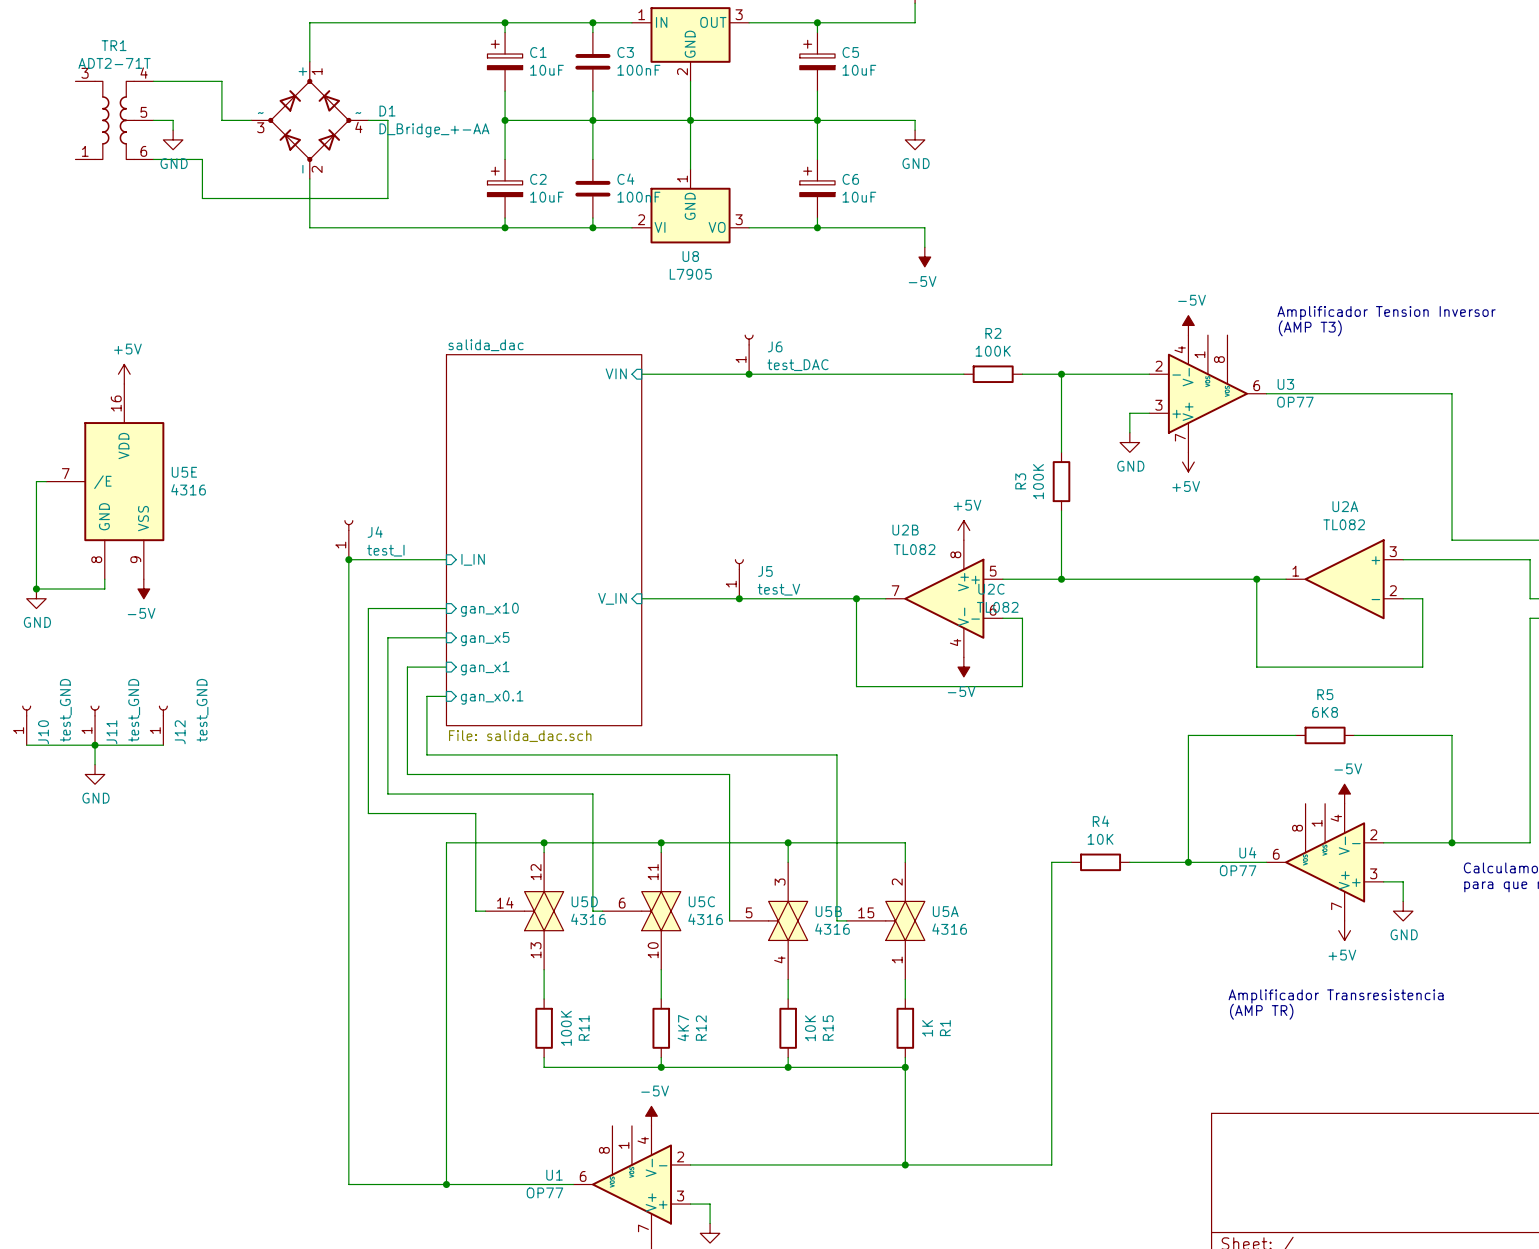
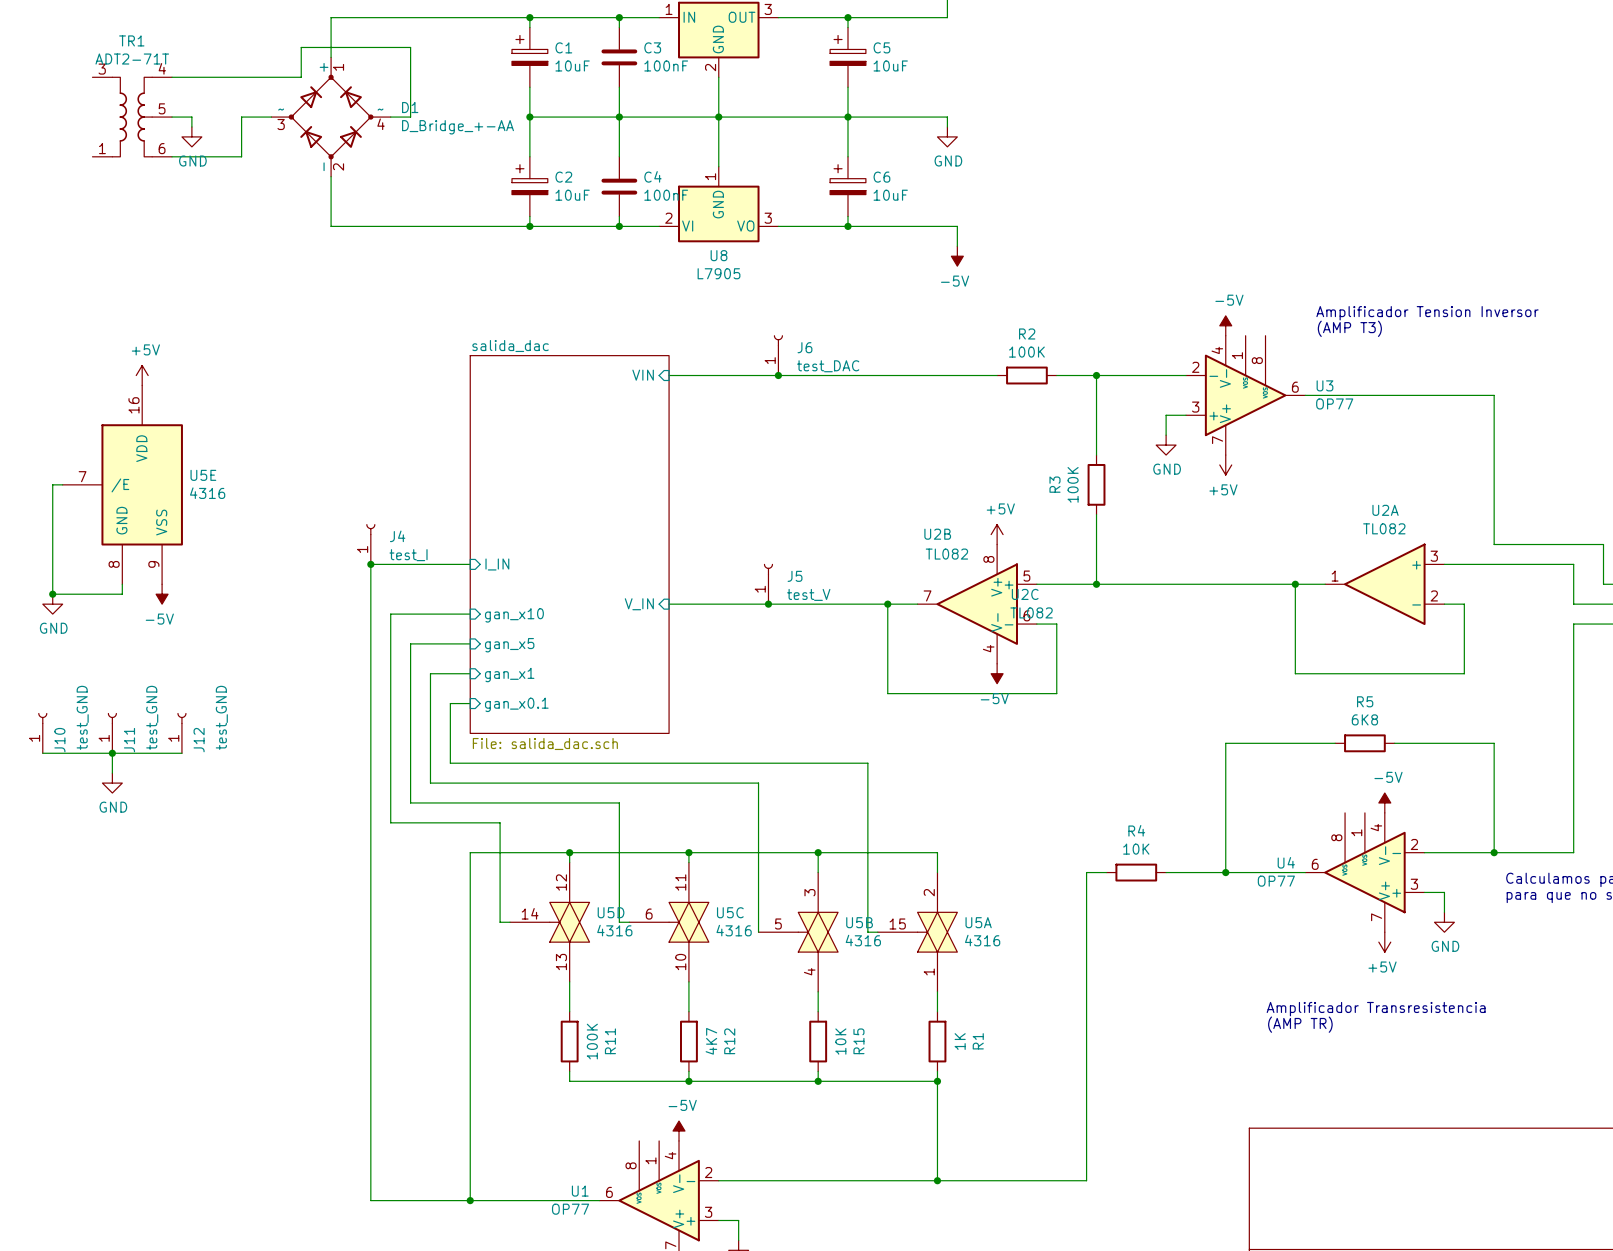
wire: (221, 81) (221, 120) -> (221, 156) (241, 156) (241, 117)
wire: (387, 120) (387, 198) (202, 198) (202, 159) -> (410, 117) (410, 47) (301, 47) (301, 77) (241, 77)

